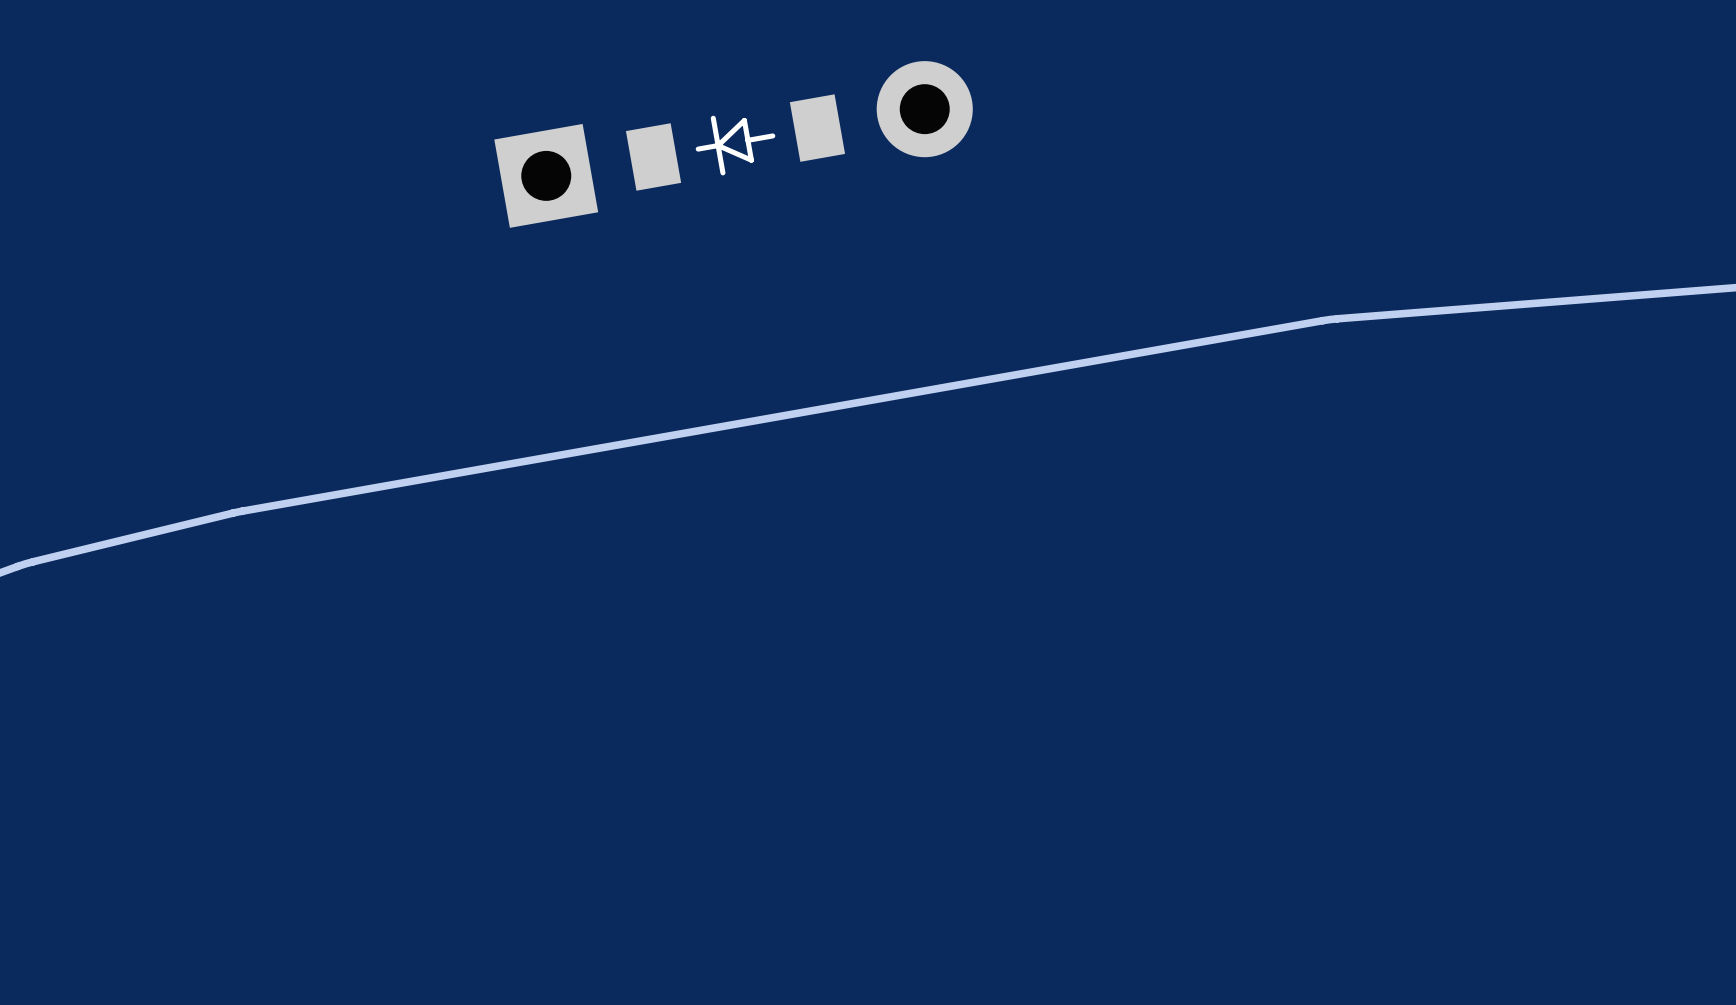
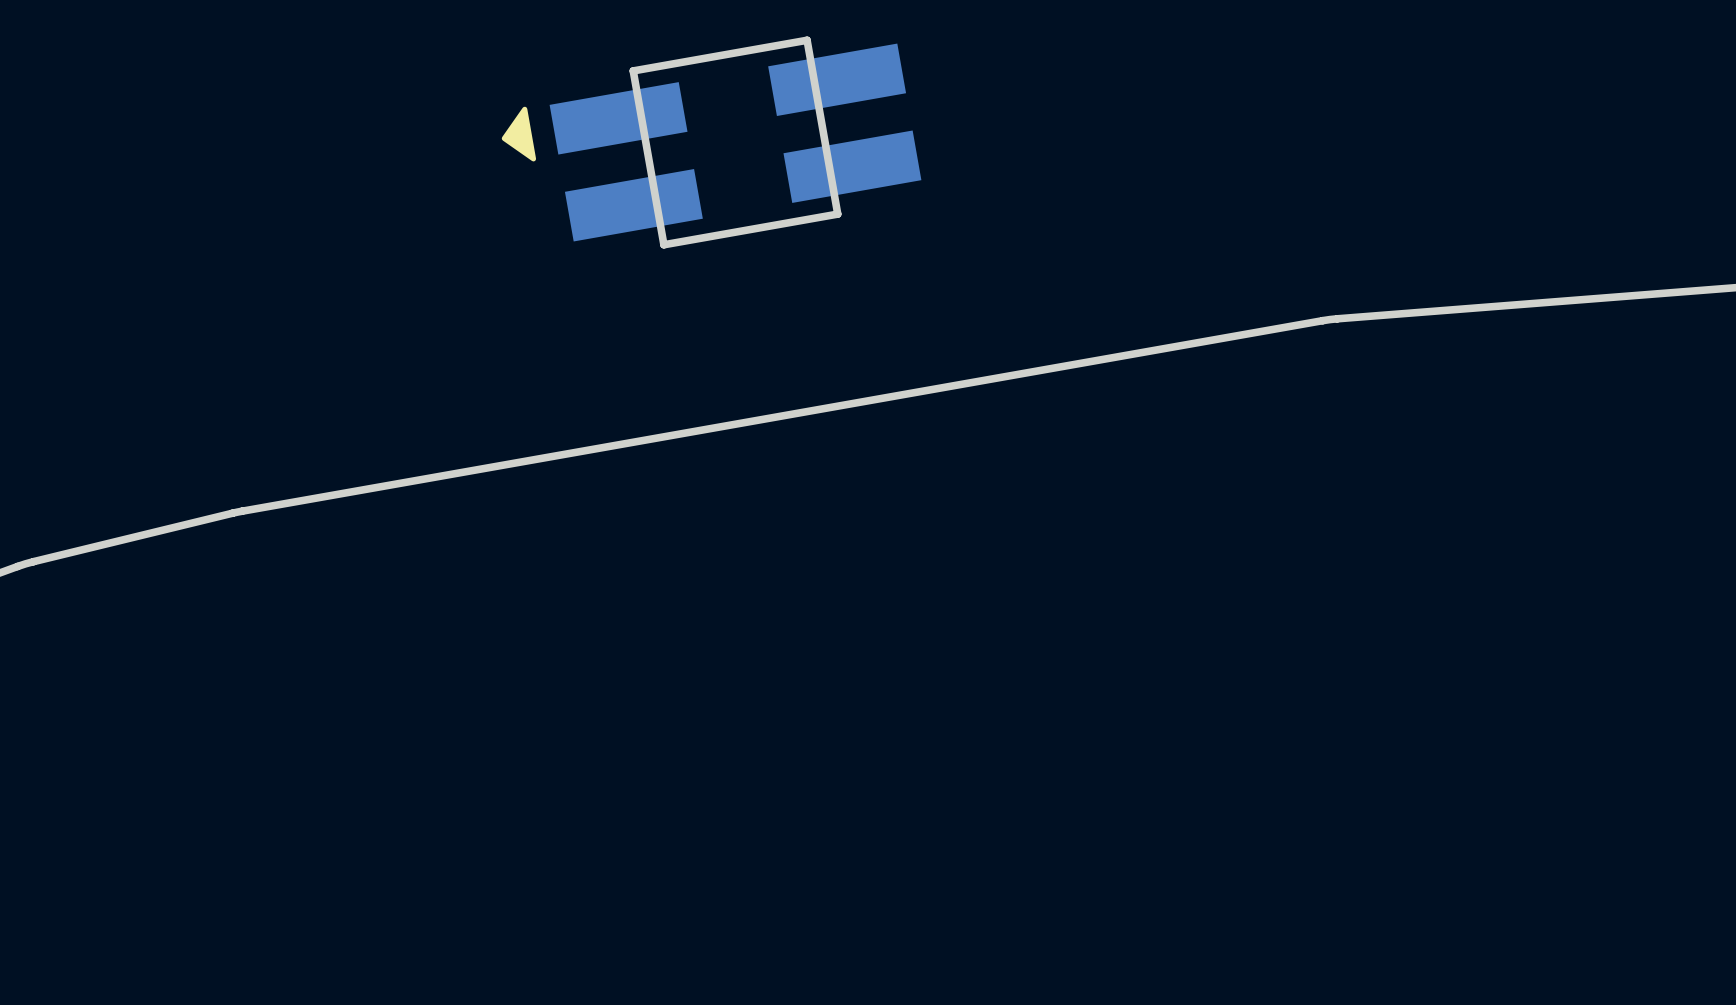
part footprint: [494, 61, 973, 228] -> [501, 36, 922, 249]

